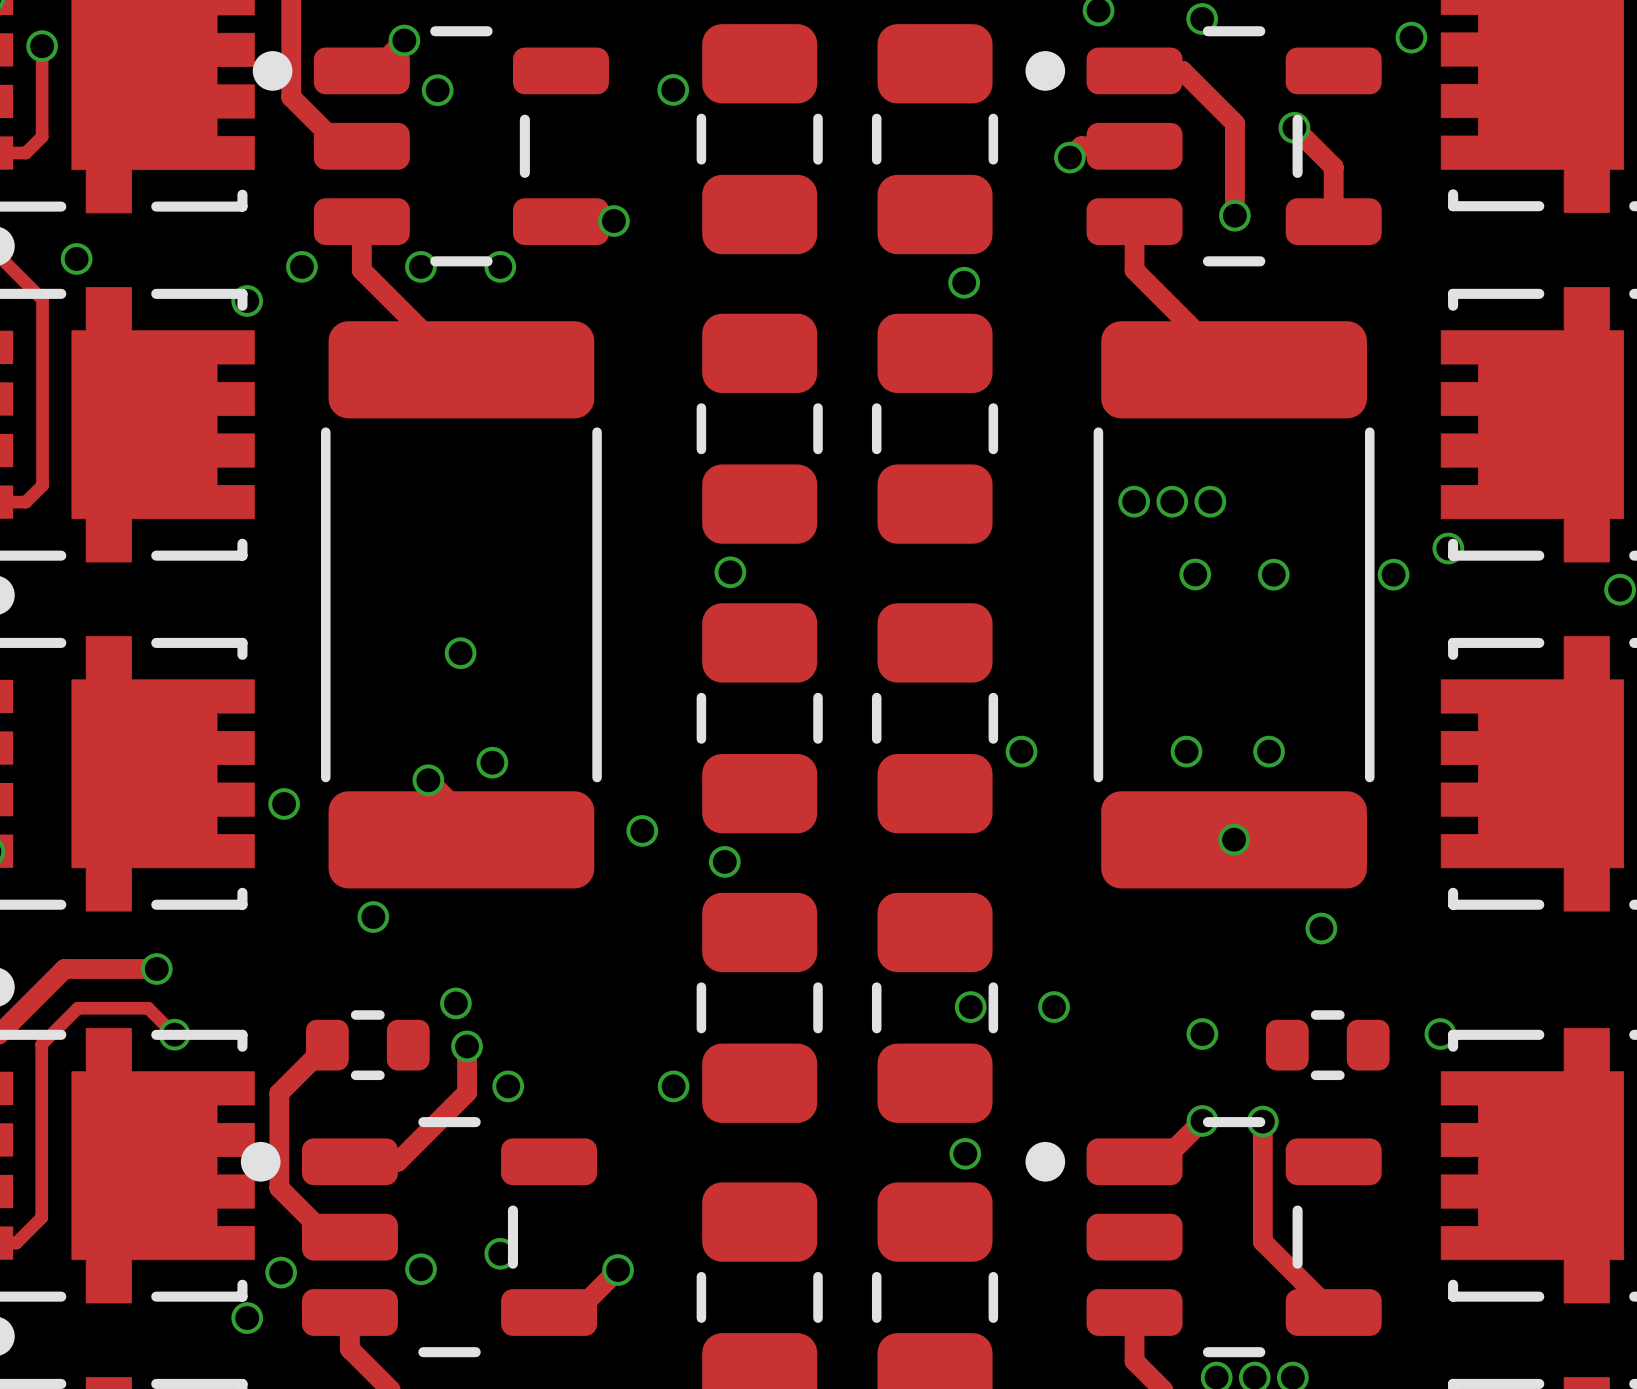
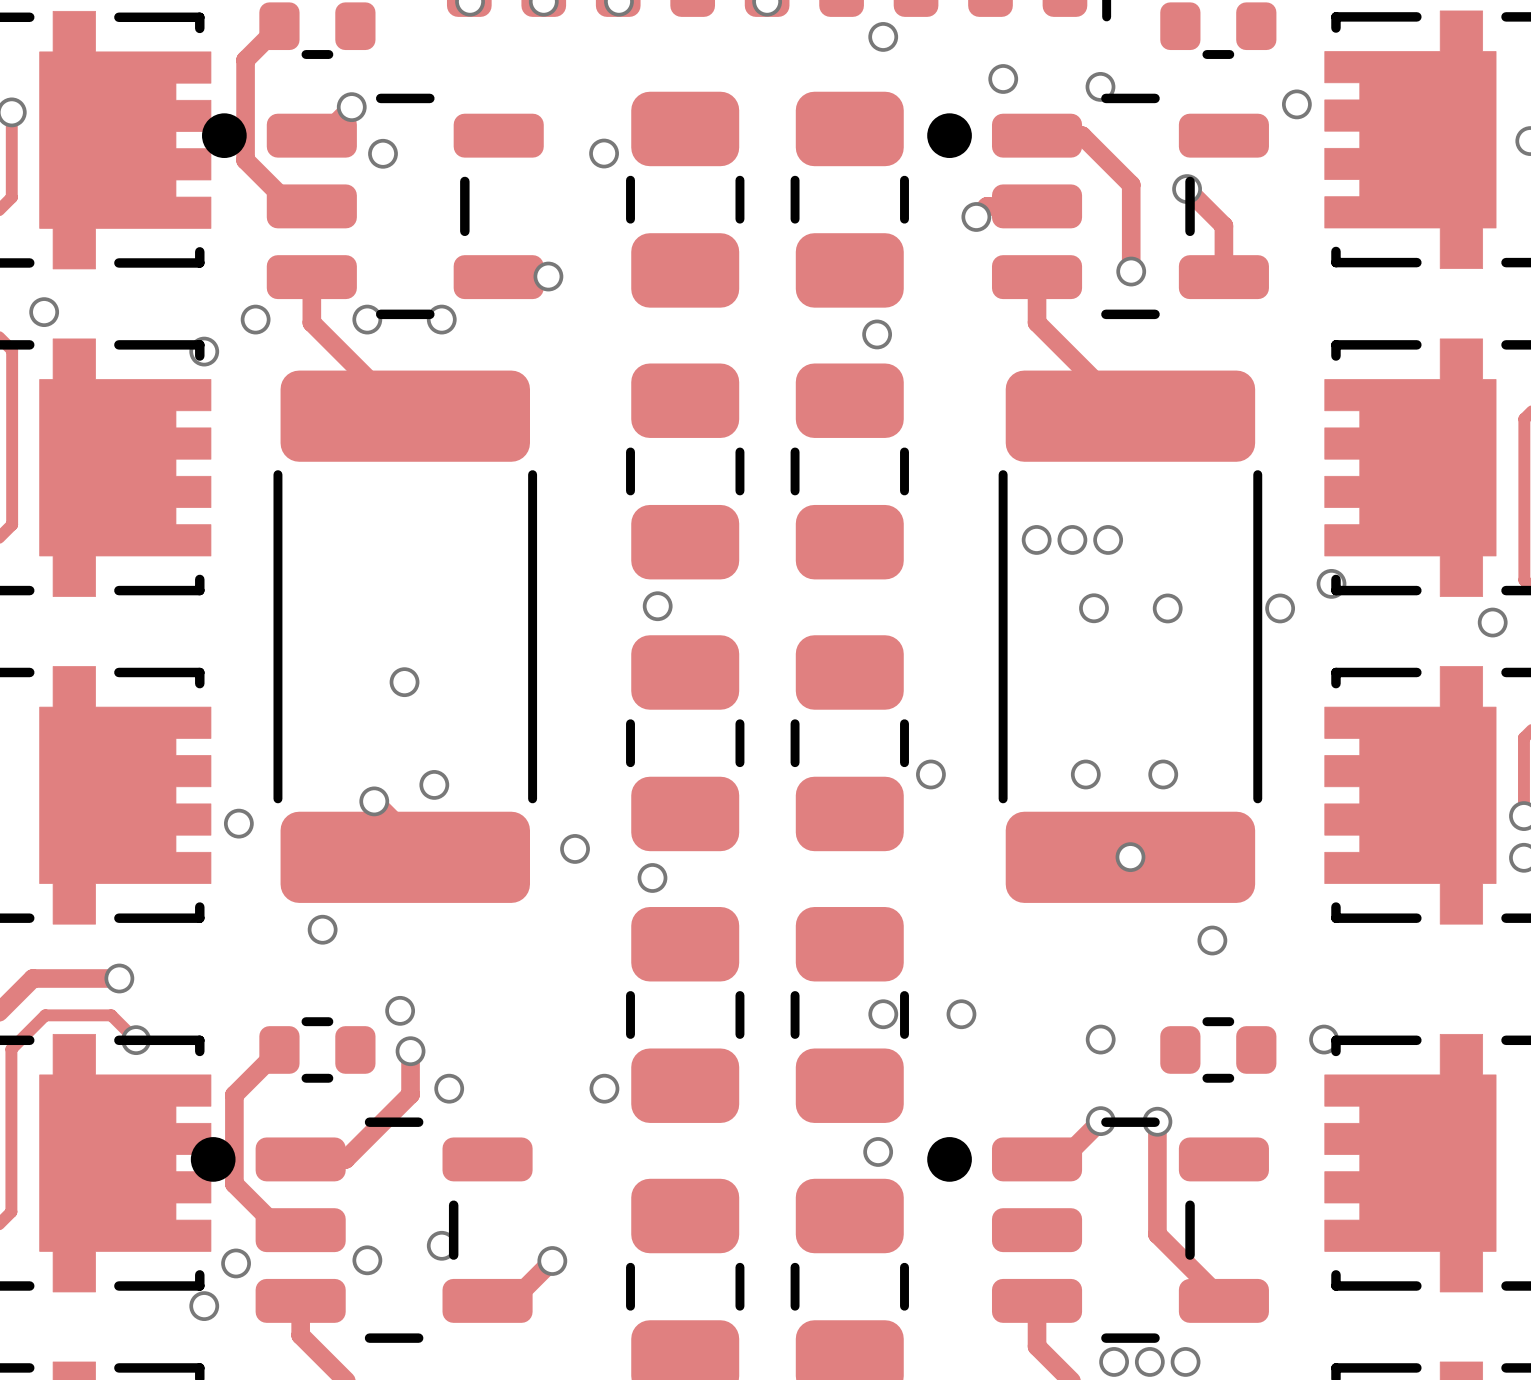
part footprint: [252, 26, 609, 267] -> [202, 93, 544, 320]
part footprint: [1025, 26, 1382, 267] -> [927, 93, 1269, 320]
part footprint: [240, 1117, 598, 1358] -> [190, 1117, 533, 1343]
part footprint: [1025, 1117, 1382, 1358] -> [927, 1117, 1269, 1343]

